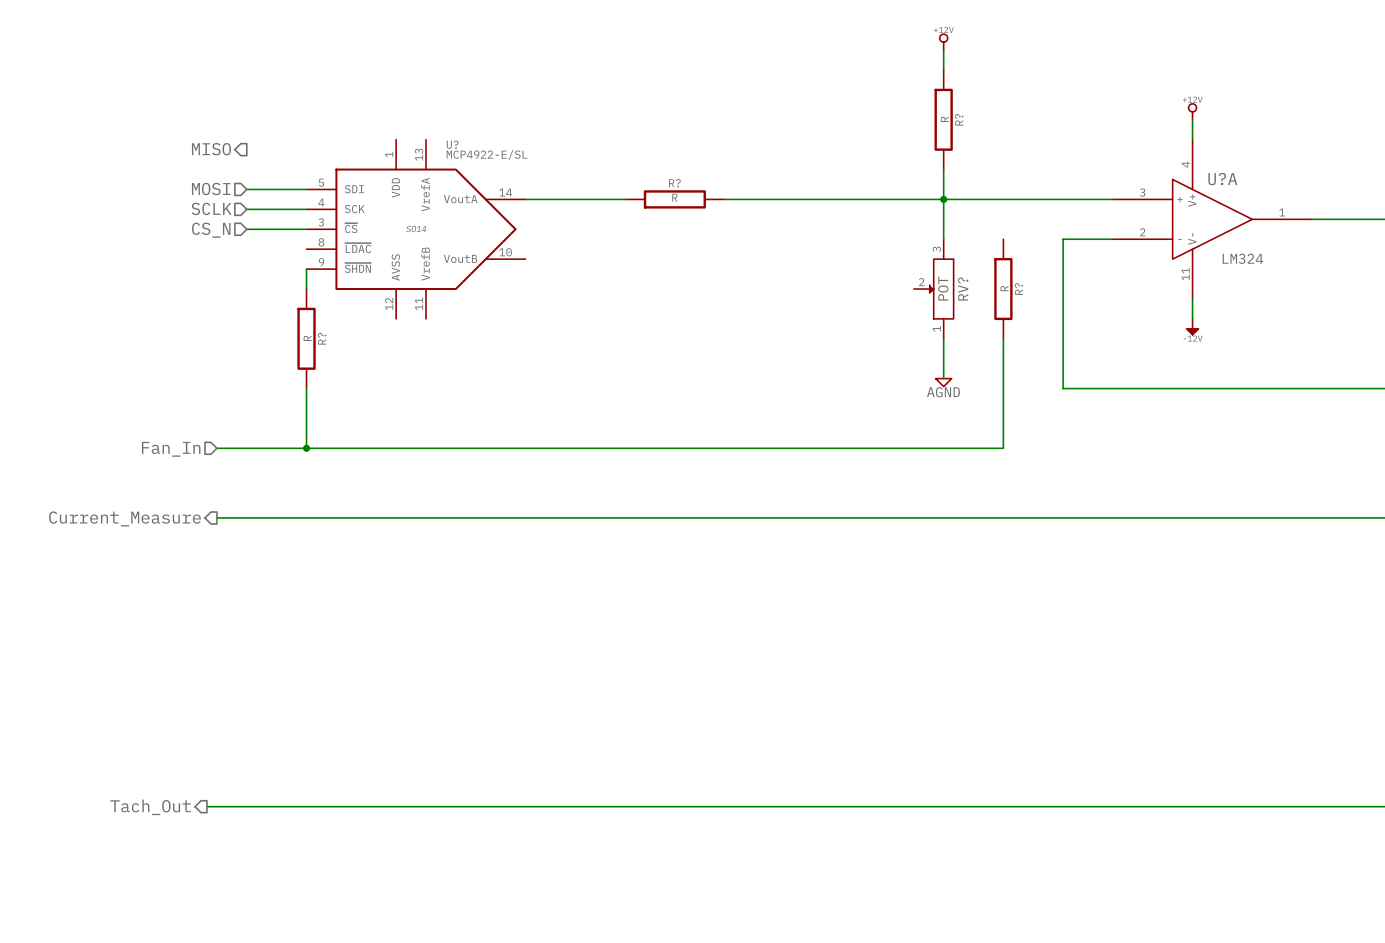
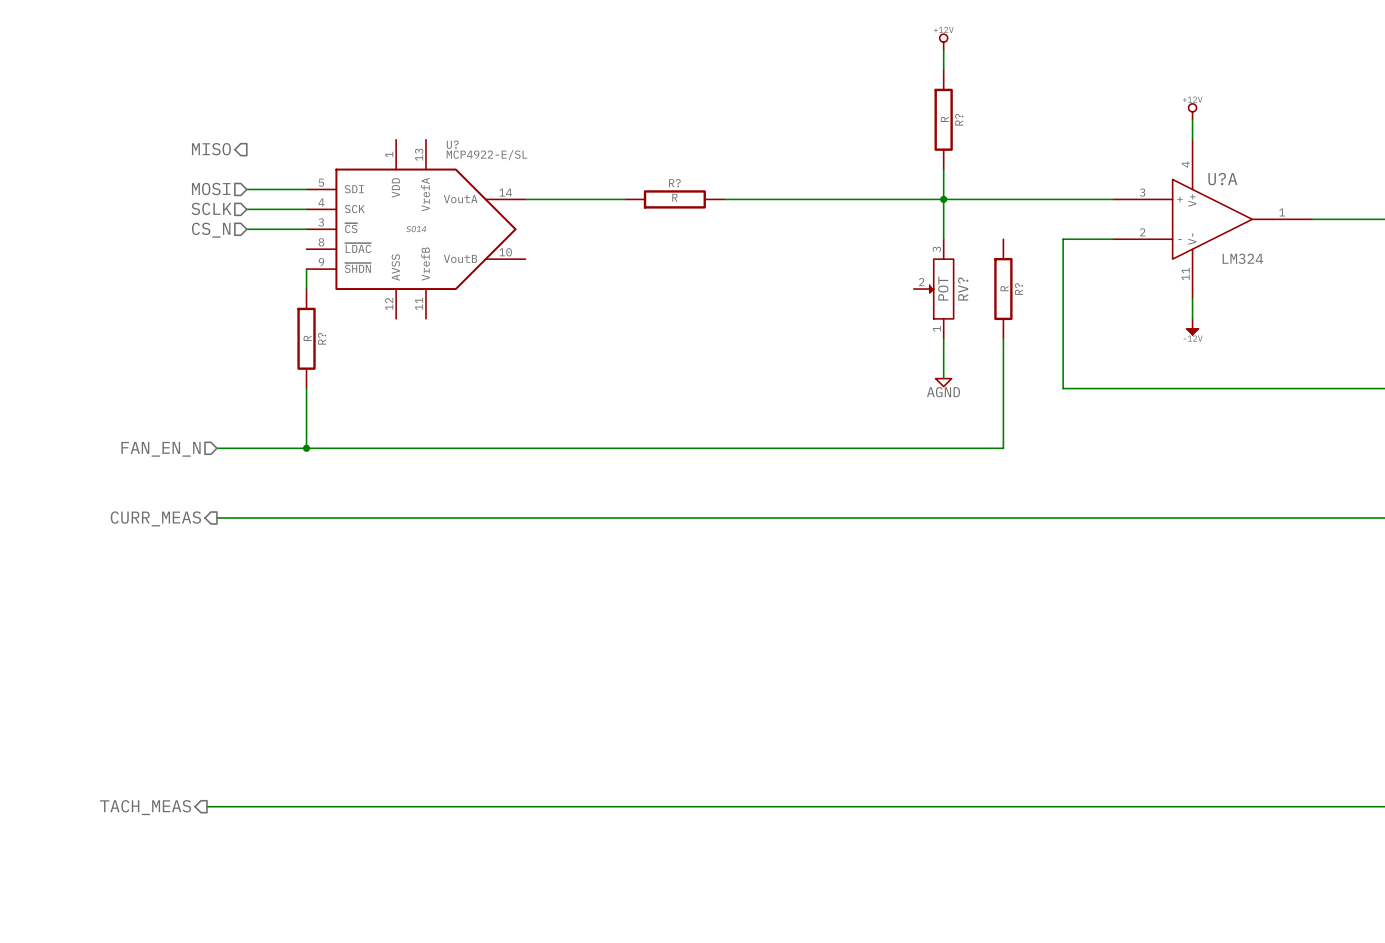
hierarchical label: Fan_In (171, 449) -> FAN_EN_N (161, 449)
hierarchical label: Current_Measure (125, 518) -> CURR_MEAS (155, 518)
hierarchical label: Tach_Out (150, 807) -> TACH_MEAS (145, 807)

